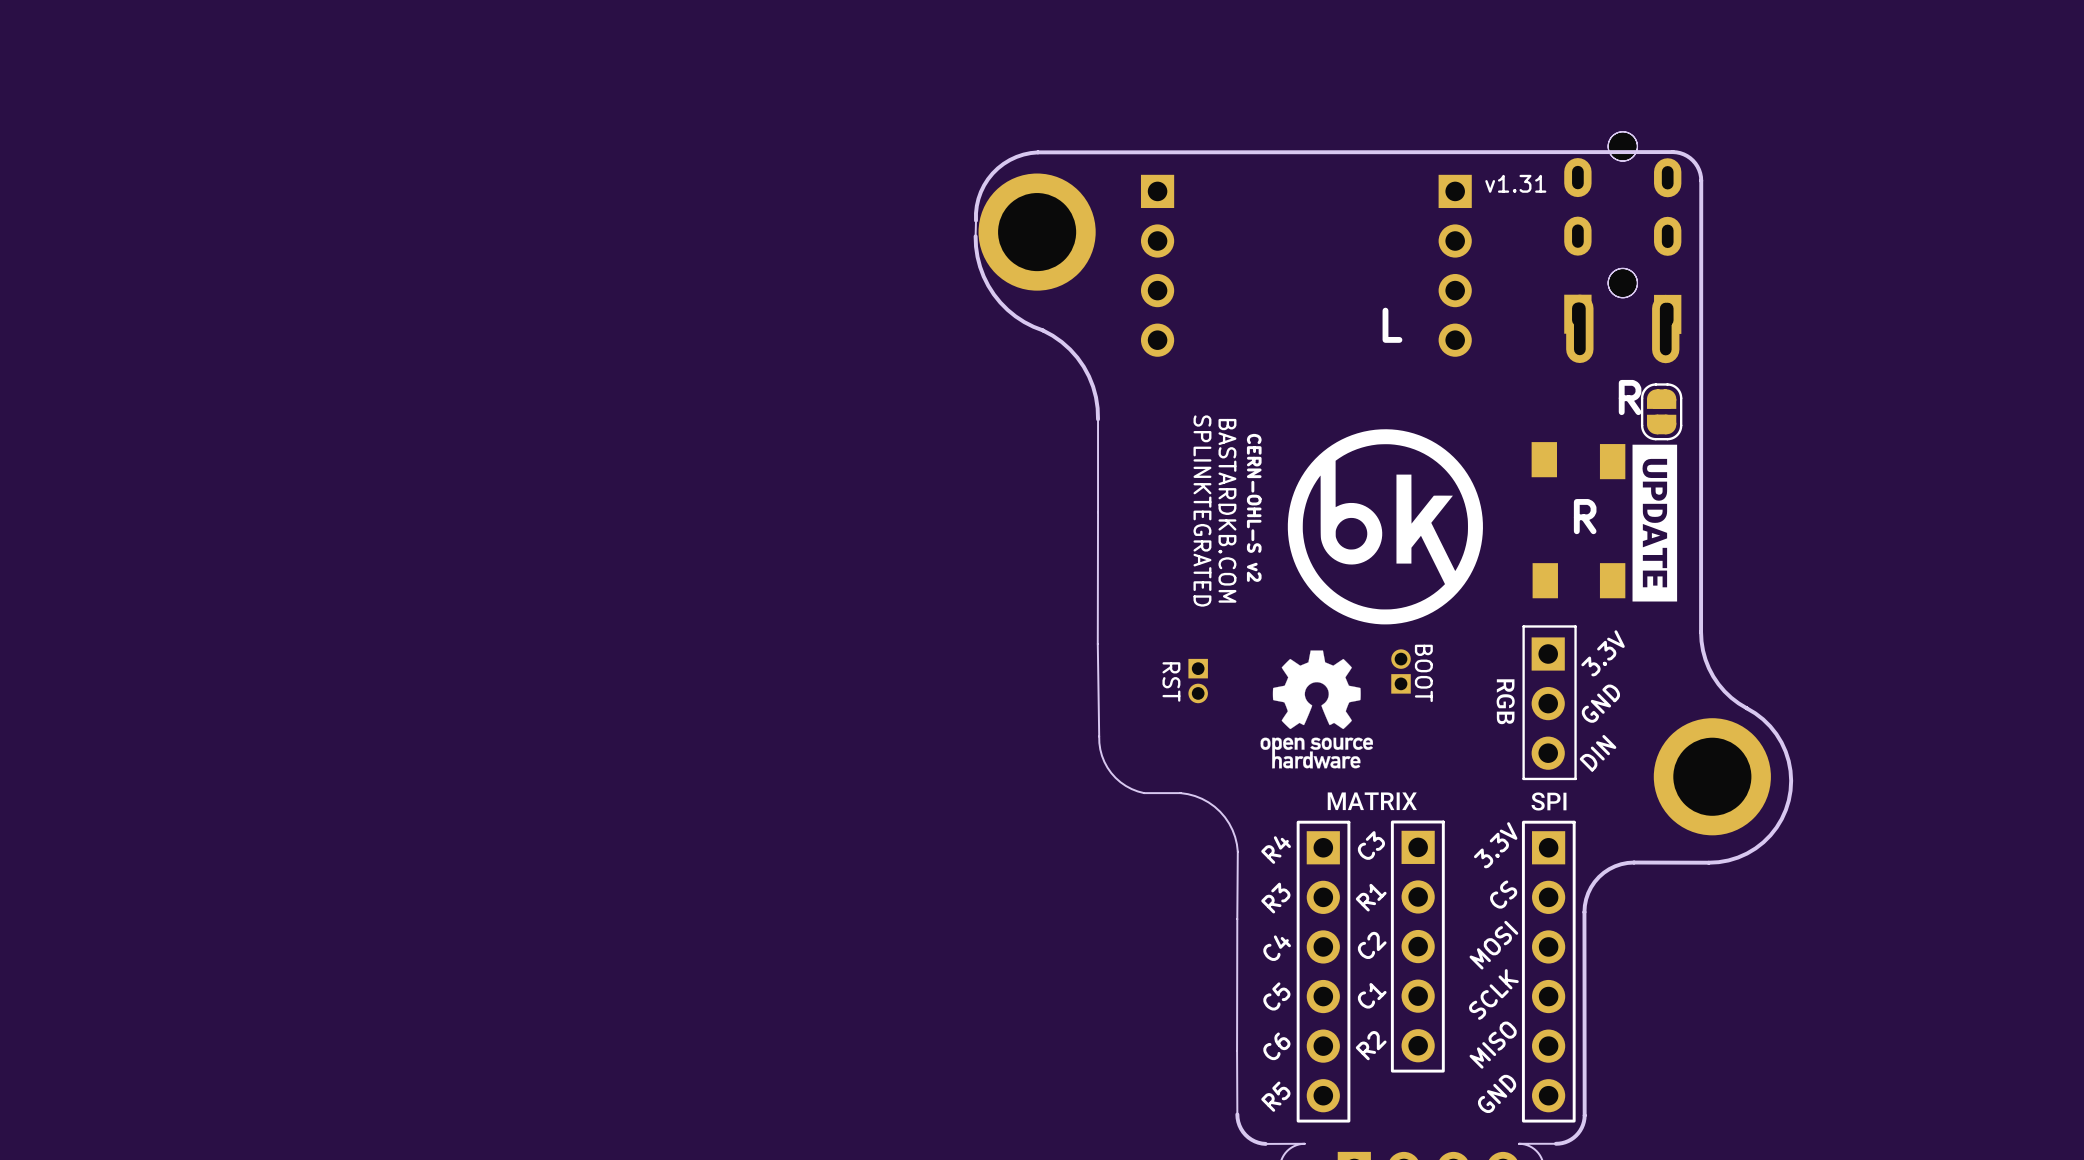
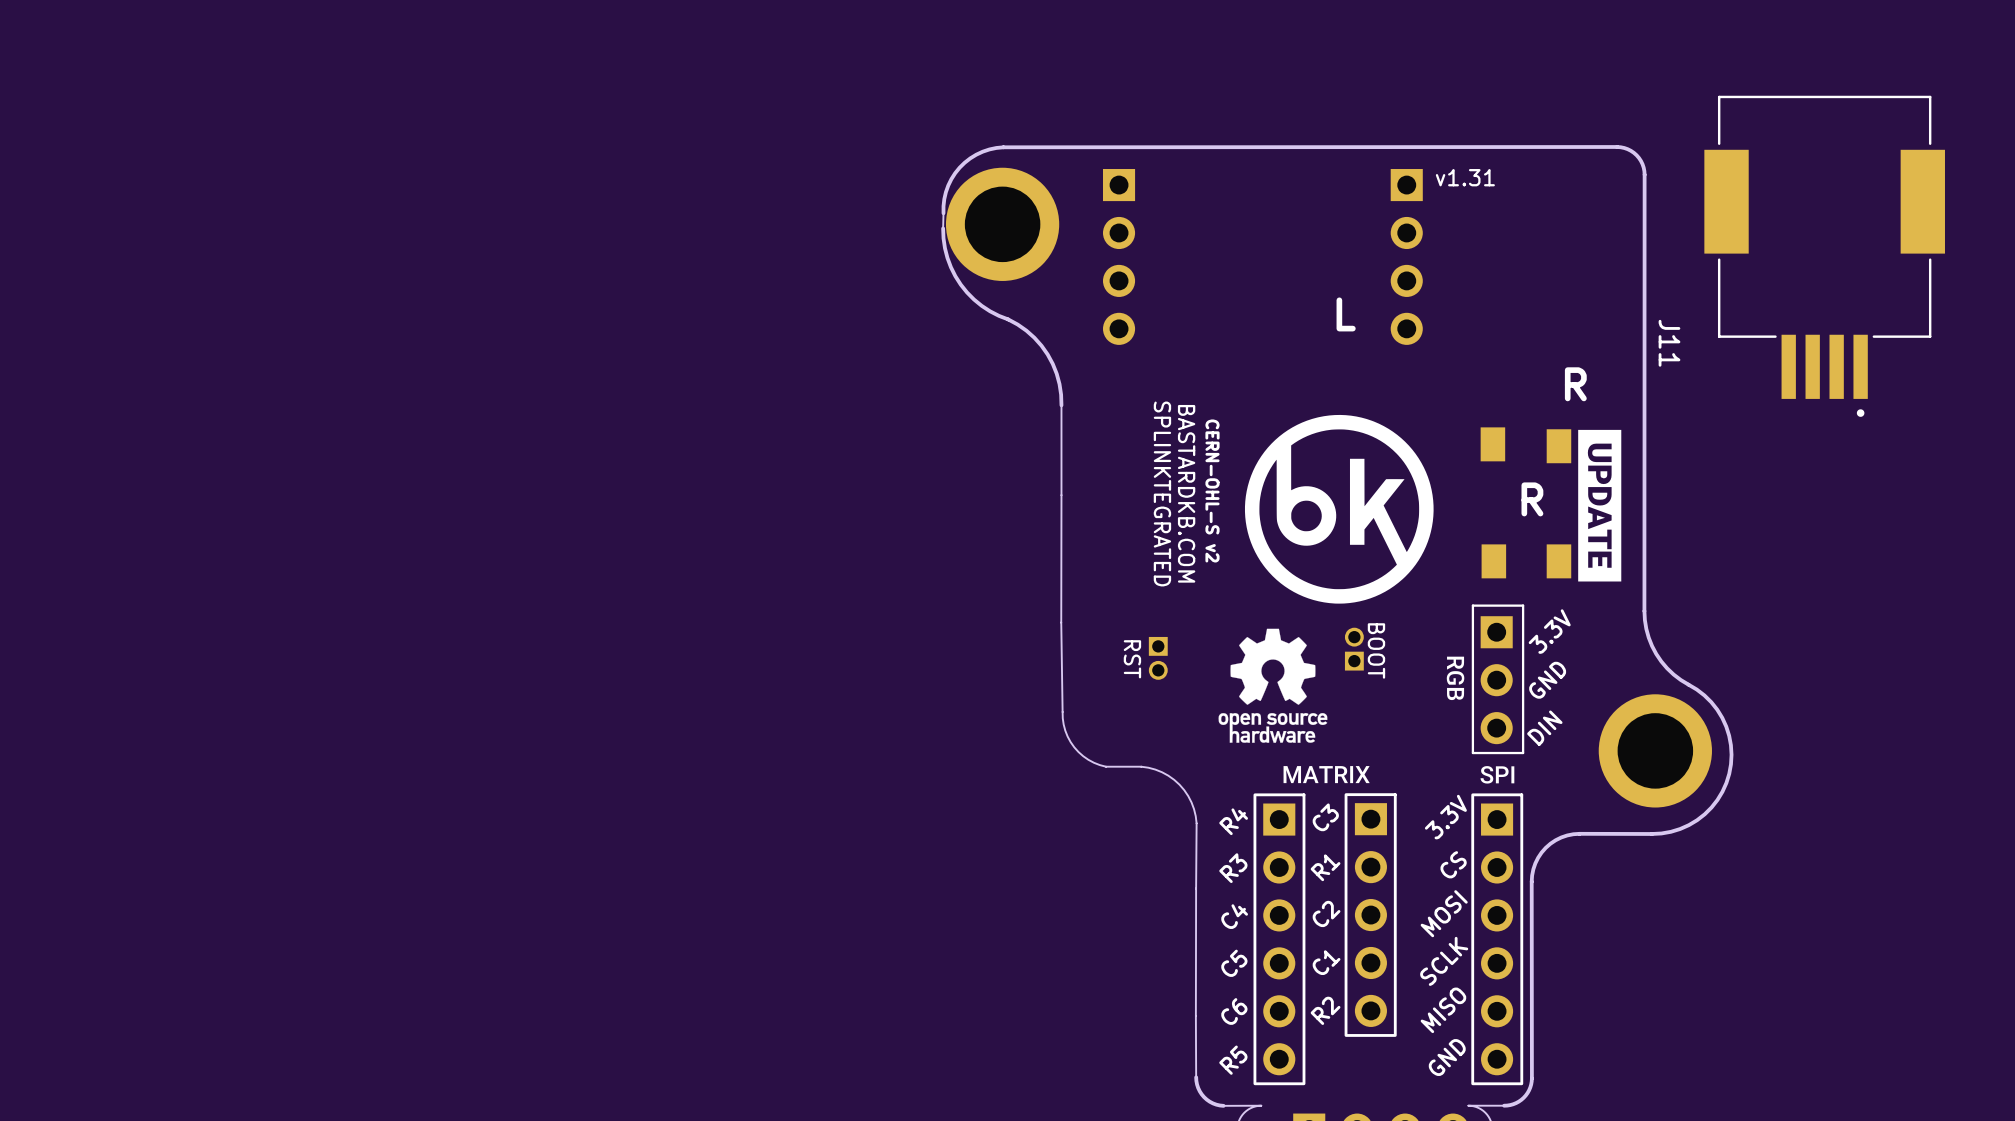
part: (1600, 247) -> none
part: (1644, 247) -> none
J11: none -> (1824, 256)
part: (1661, 411) -> none

